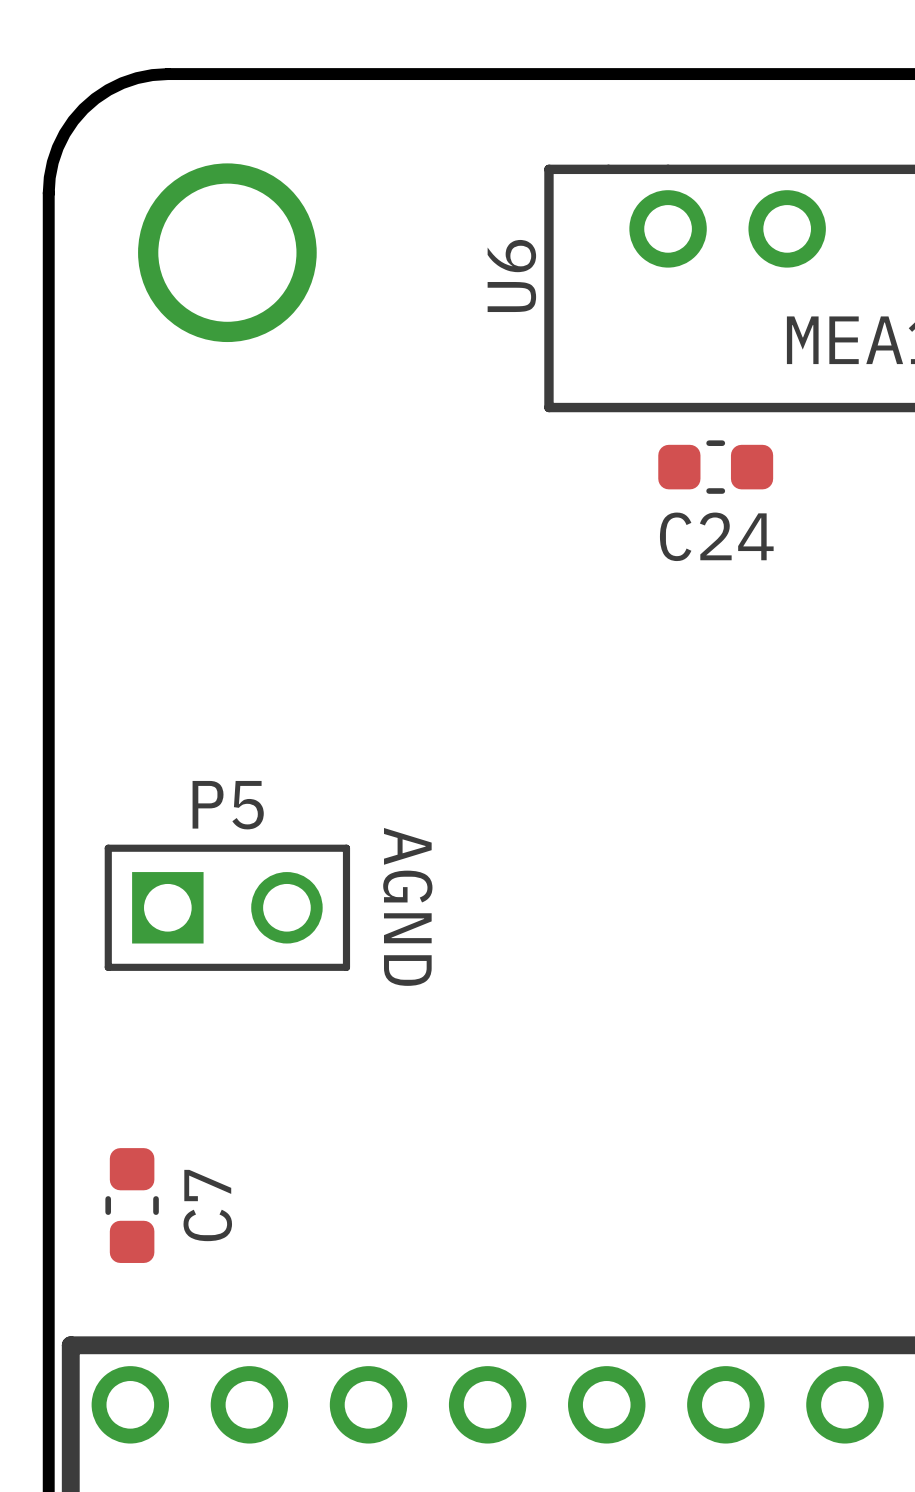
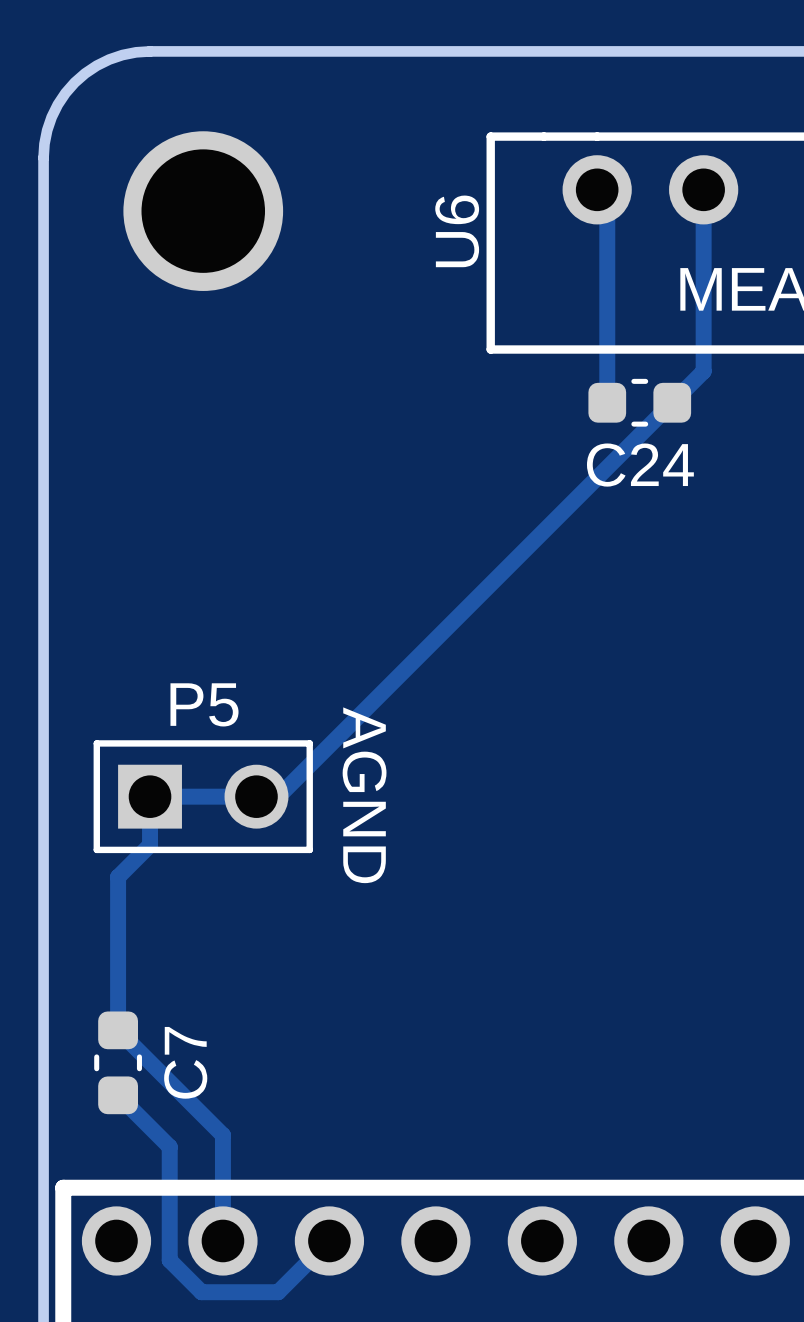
track: none -> (597, 189) (607, 199) (607, 402)
track: none -> (703, 189) (703, 371) (278, 796) (150, 796) (150, 845) (118, 877) (118, 1030) (222, 1135) (222, 1240)
track: none -> (118, 1095) (169, 1146) (169, 1260) (201, 1292) (278, 1292) (329, 1240)

